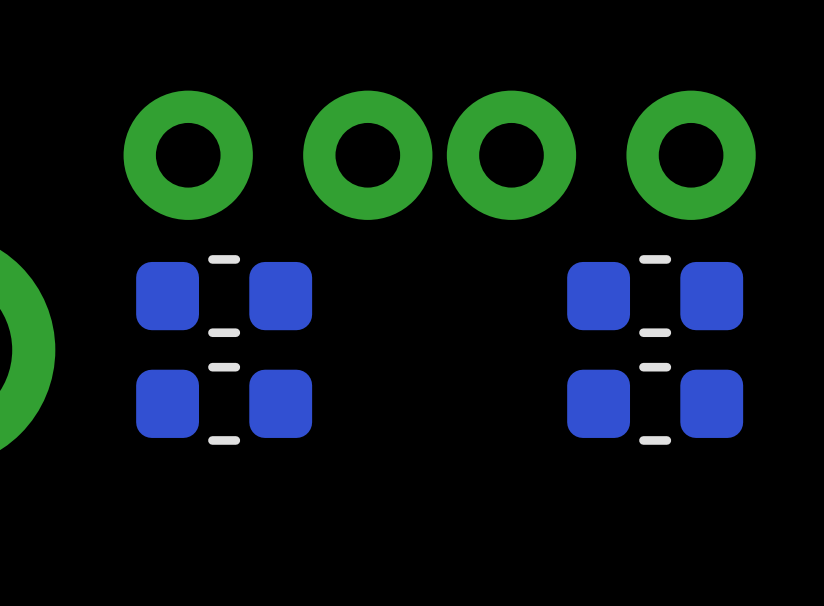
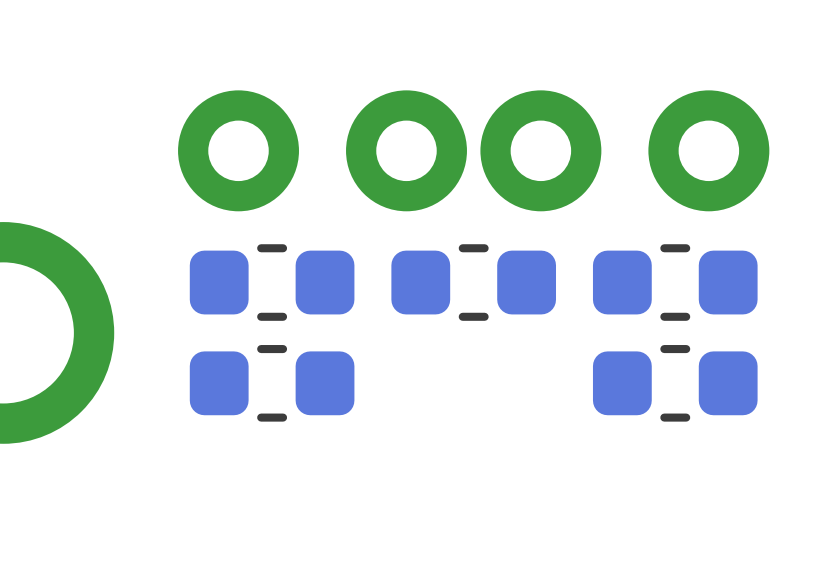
part: none -> (473, 282)

